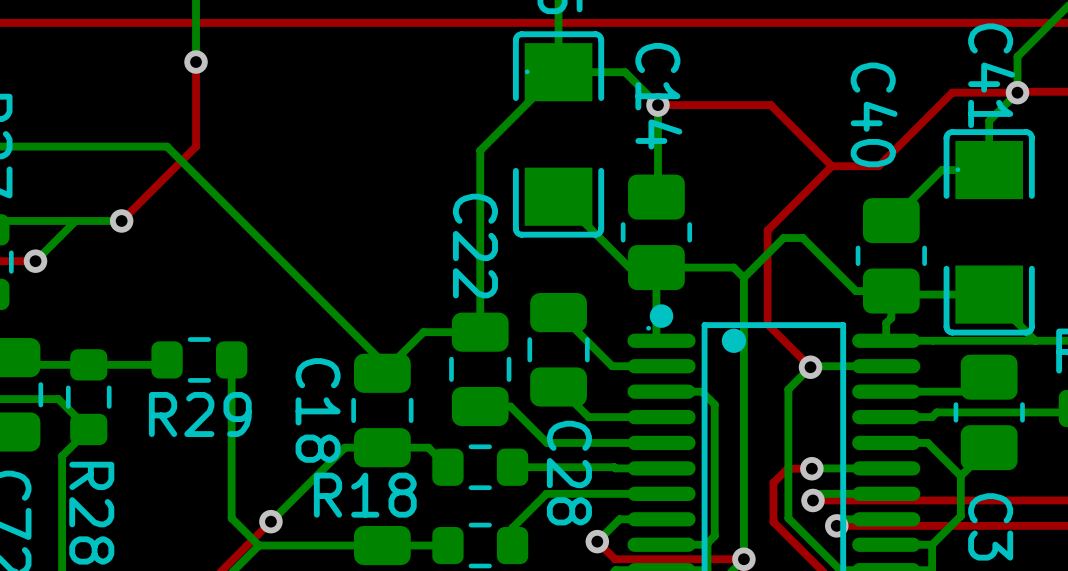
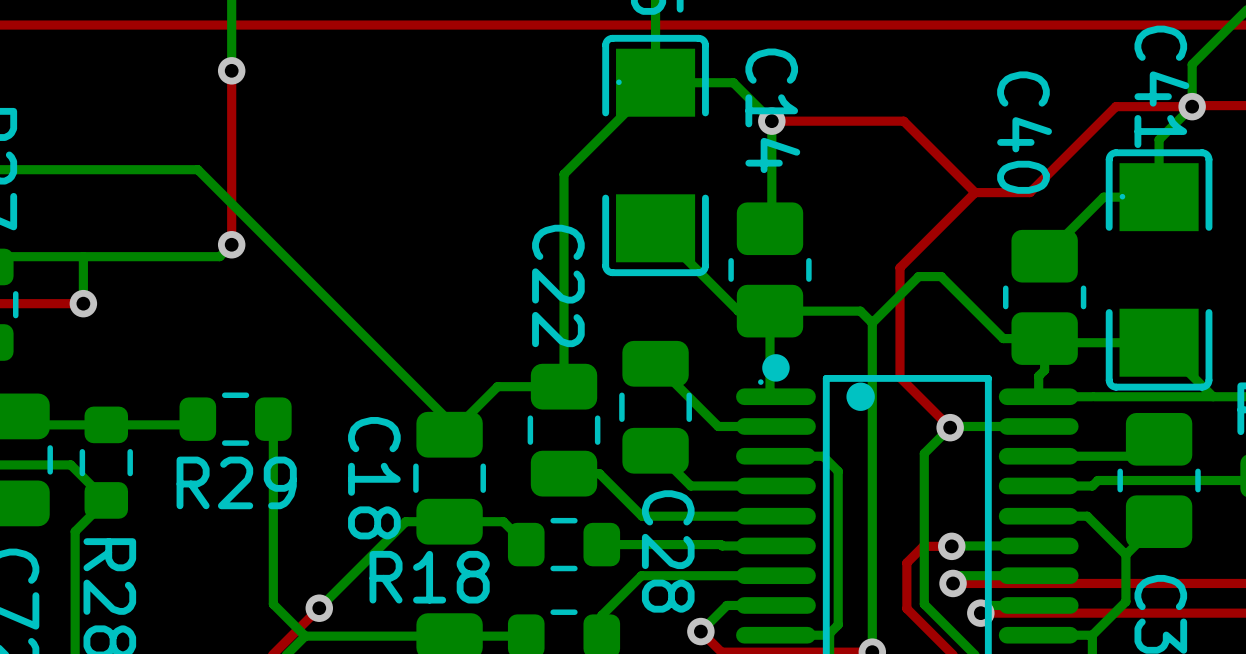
top track: (196, 146) (121, 220) -> (231, 169) (231, 244)
bottom track: none -> (231, 244) (219, 256) (144, 256)
via: none -> (231, 244)
bottom track: none -> (83, 256) (83, 303)
via: (121, 220) -> none
bottom track: (74, 222) (35, 261) -> none
via: (35, 261) -> none
top track: none -> (83, 303) (44, 303)
via: none -> (83, 303)

